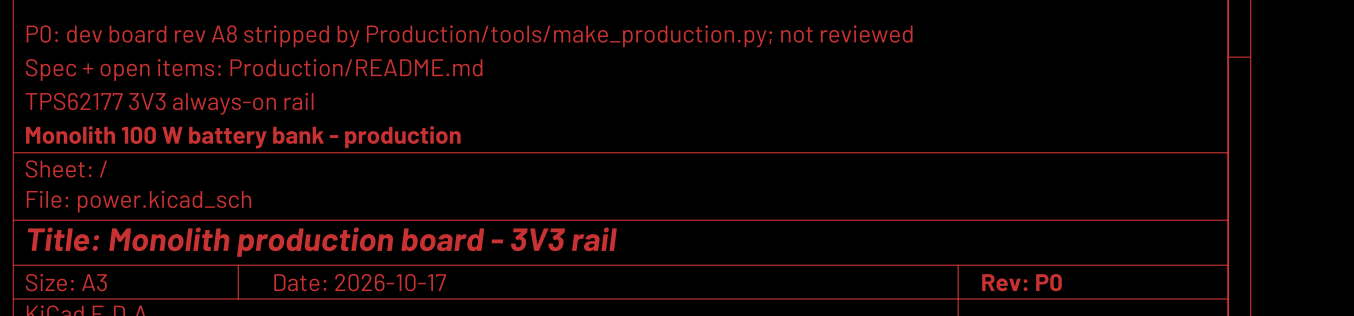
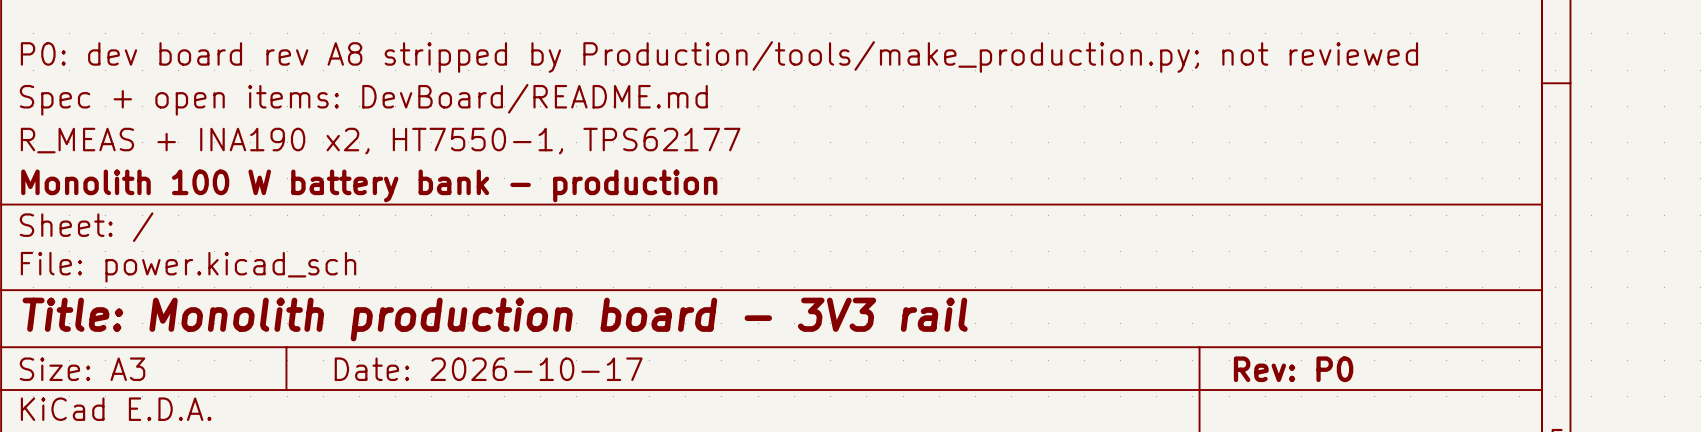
title block: Spec + open items: Production/README.md (254, 69) -> Spec + open items: DevBoard/README.md (363, 99)
title block: TPS62177 3V3 always-on rail (169, 103) -> R_MEAS + INA190 x2, HT7550-1, TPS62177 (380, 141)

